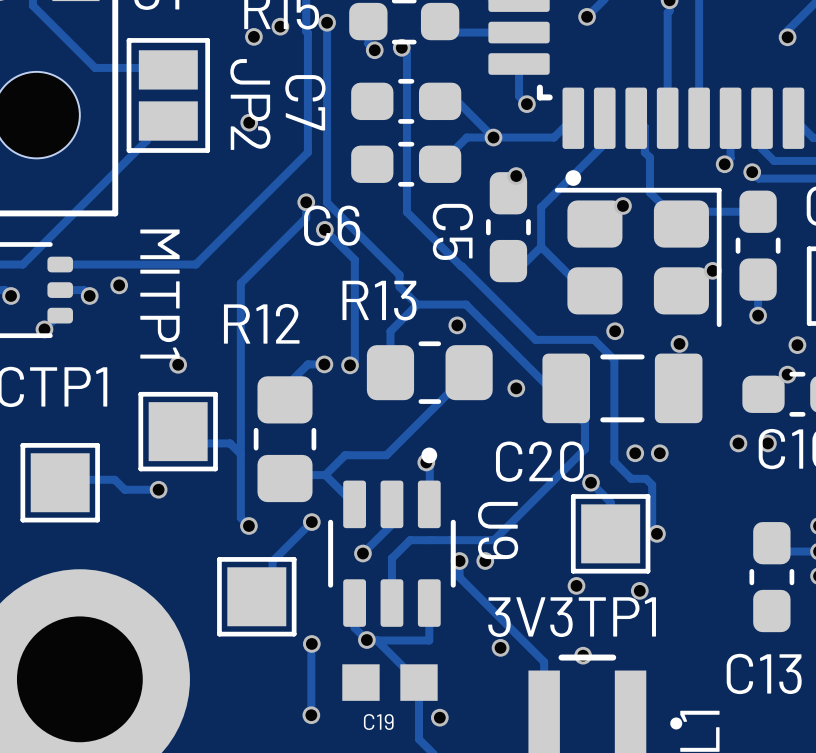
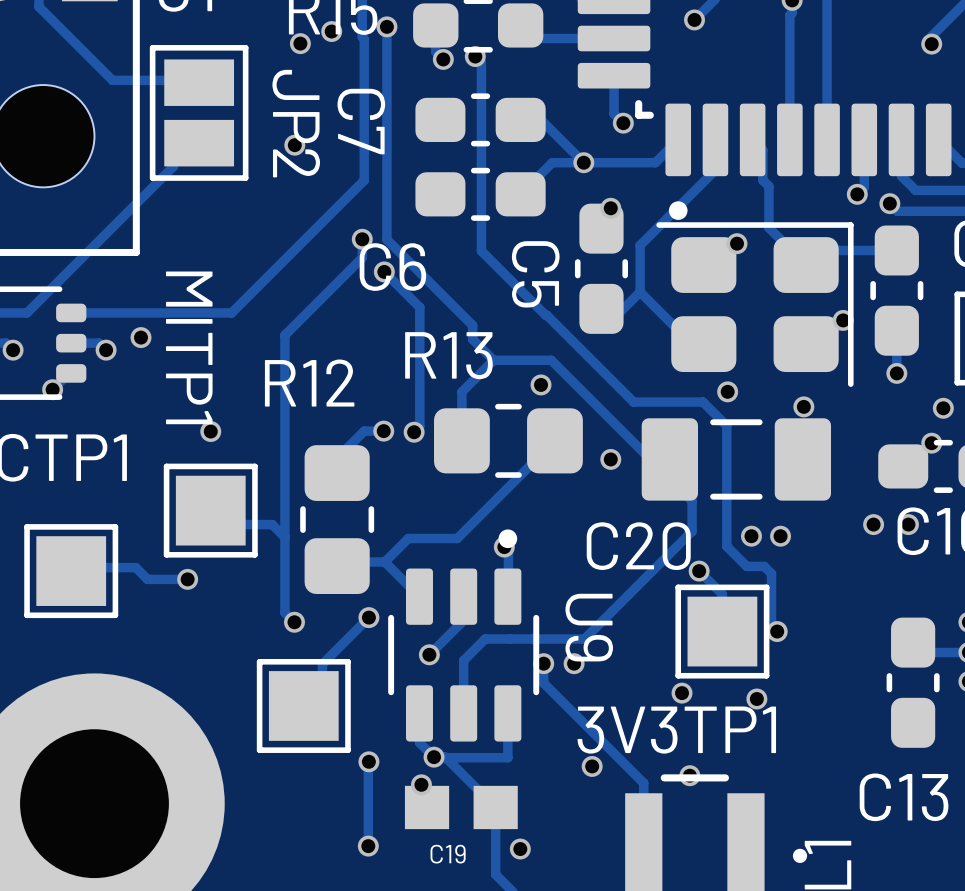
via: none -> (421, 784)

